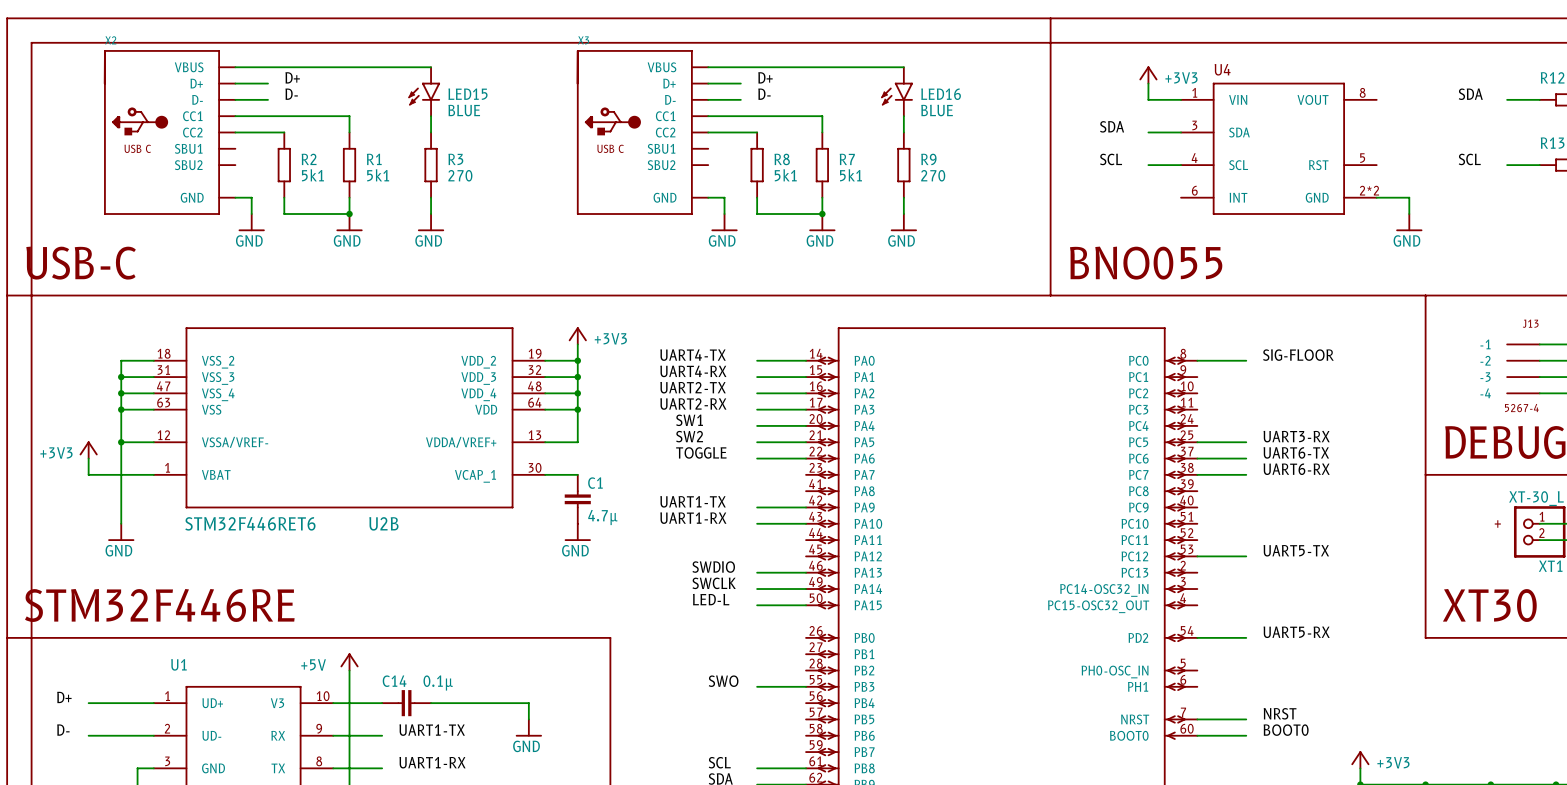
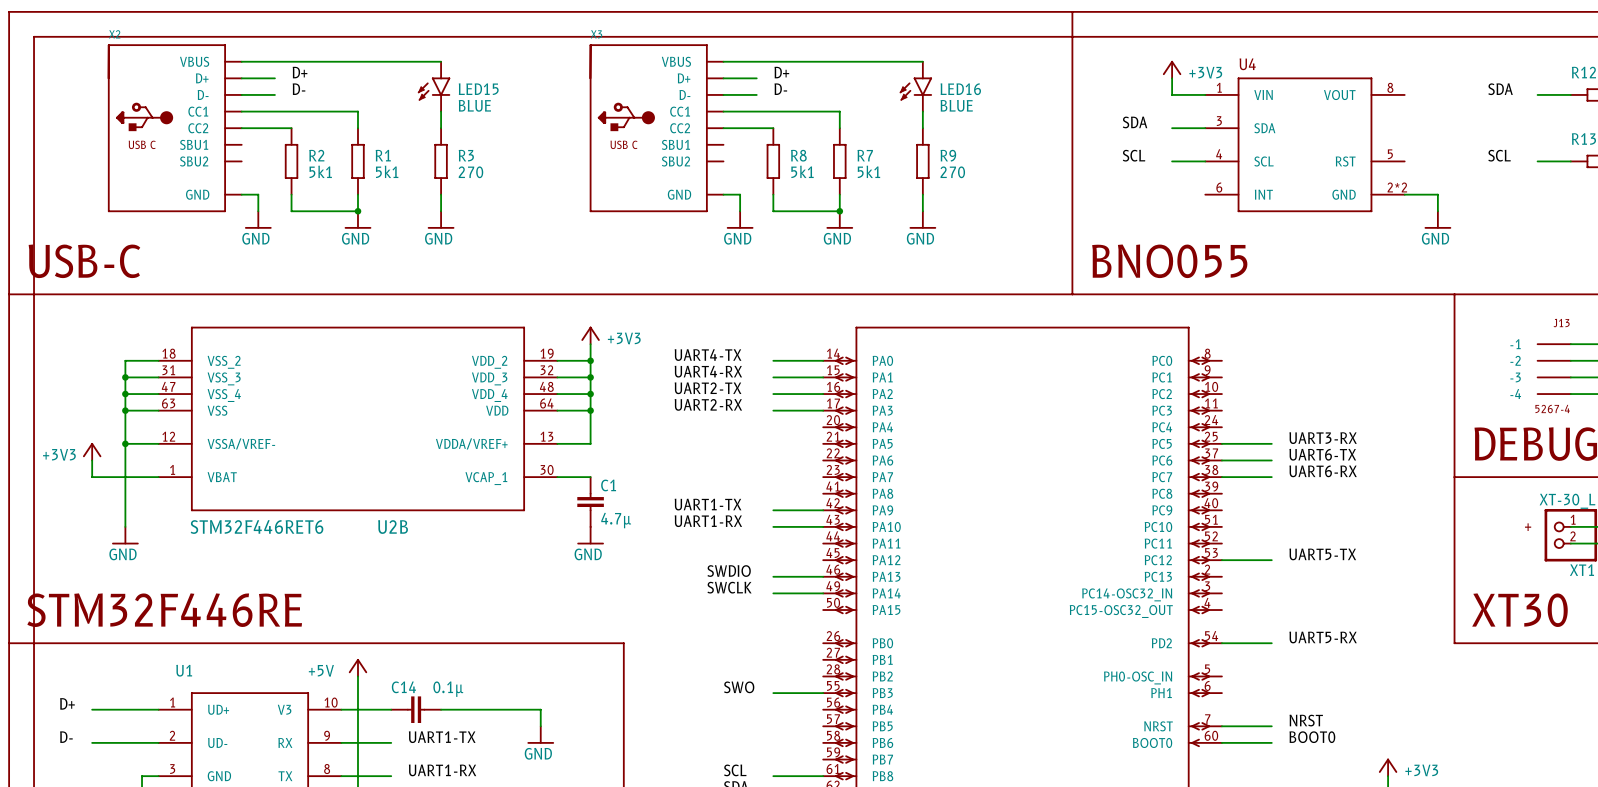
label: SIG-FLOOR (1298, 355) -> none
wire: (1197, 360) (1246, 360) -> none
label: SW1 (689, 420) -> none
wire: (757, 425) (806, 425) -> none
label: SW2 (689, 436) -> none
wire: (757, 442) (806, 442) -> none
label: TOGGLE (701, 452) -> none
wire: (757, 458) (806, 458) -> none
label: LED-L (711, 599) -> none
wire: (757, 605) (806, 605) -> none

